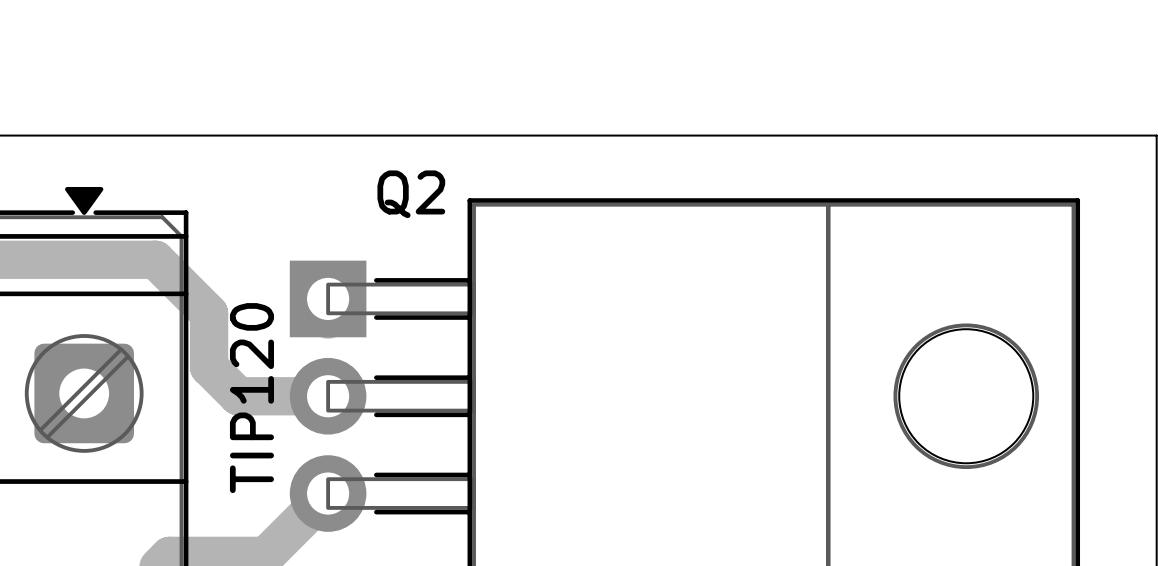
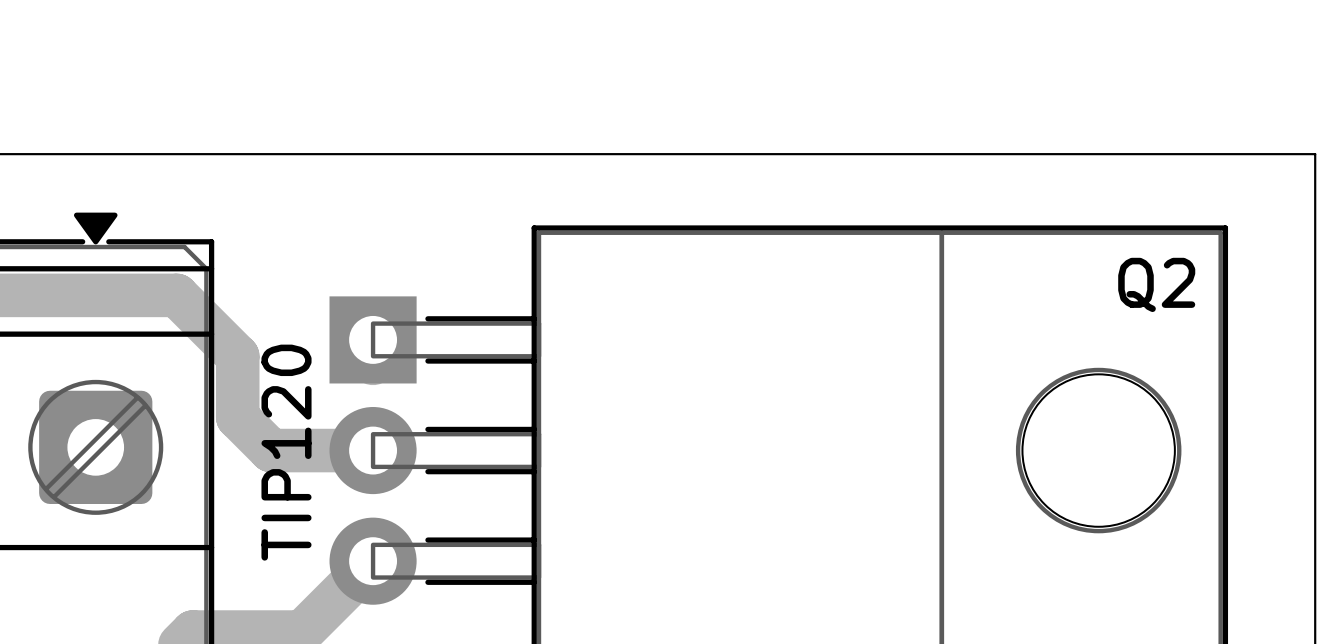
Q2 name position: Q2 (411, 194) -> Q2 (1156, 284)

